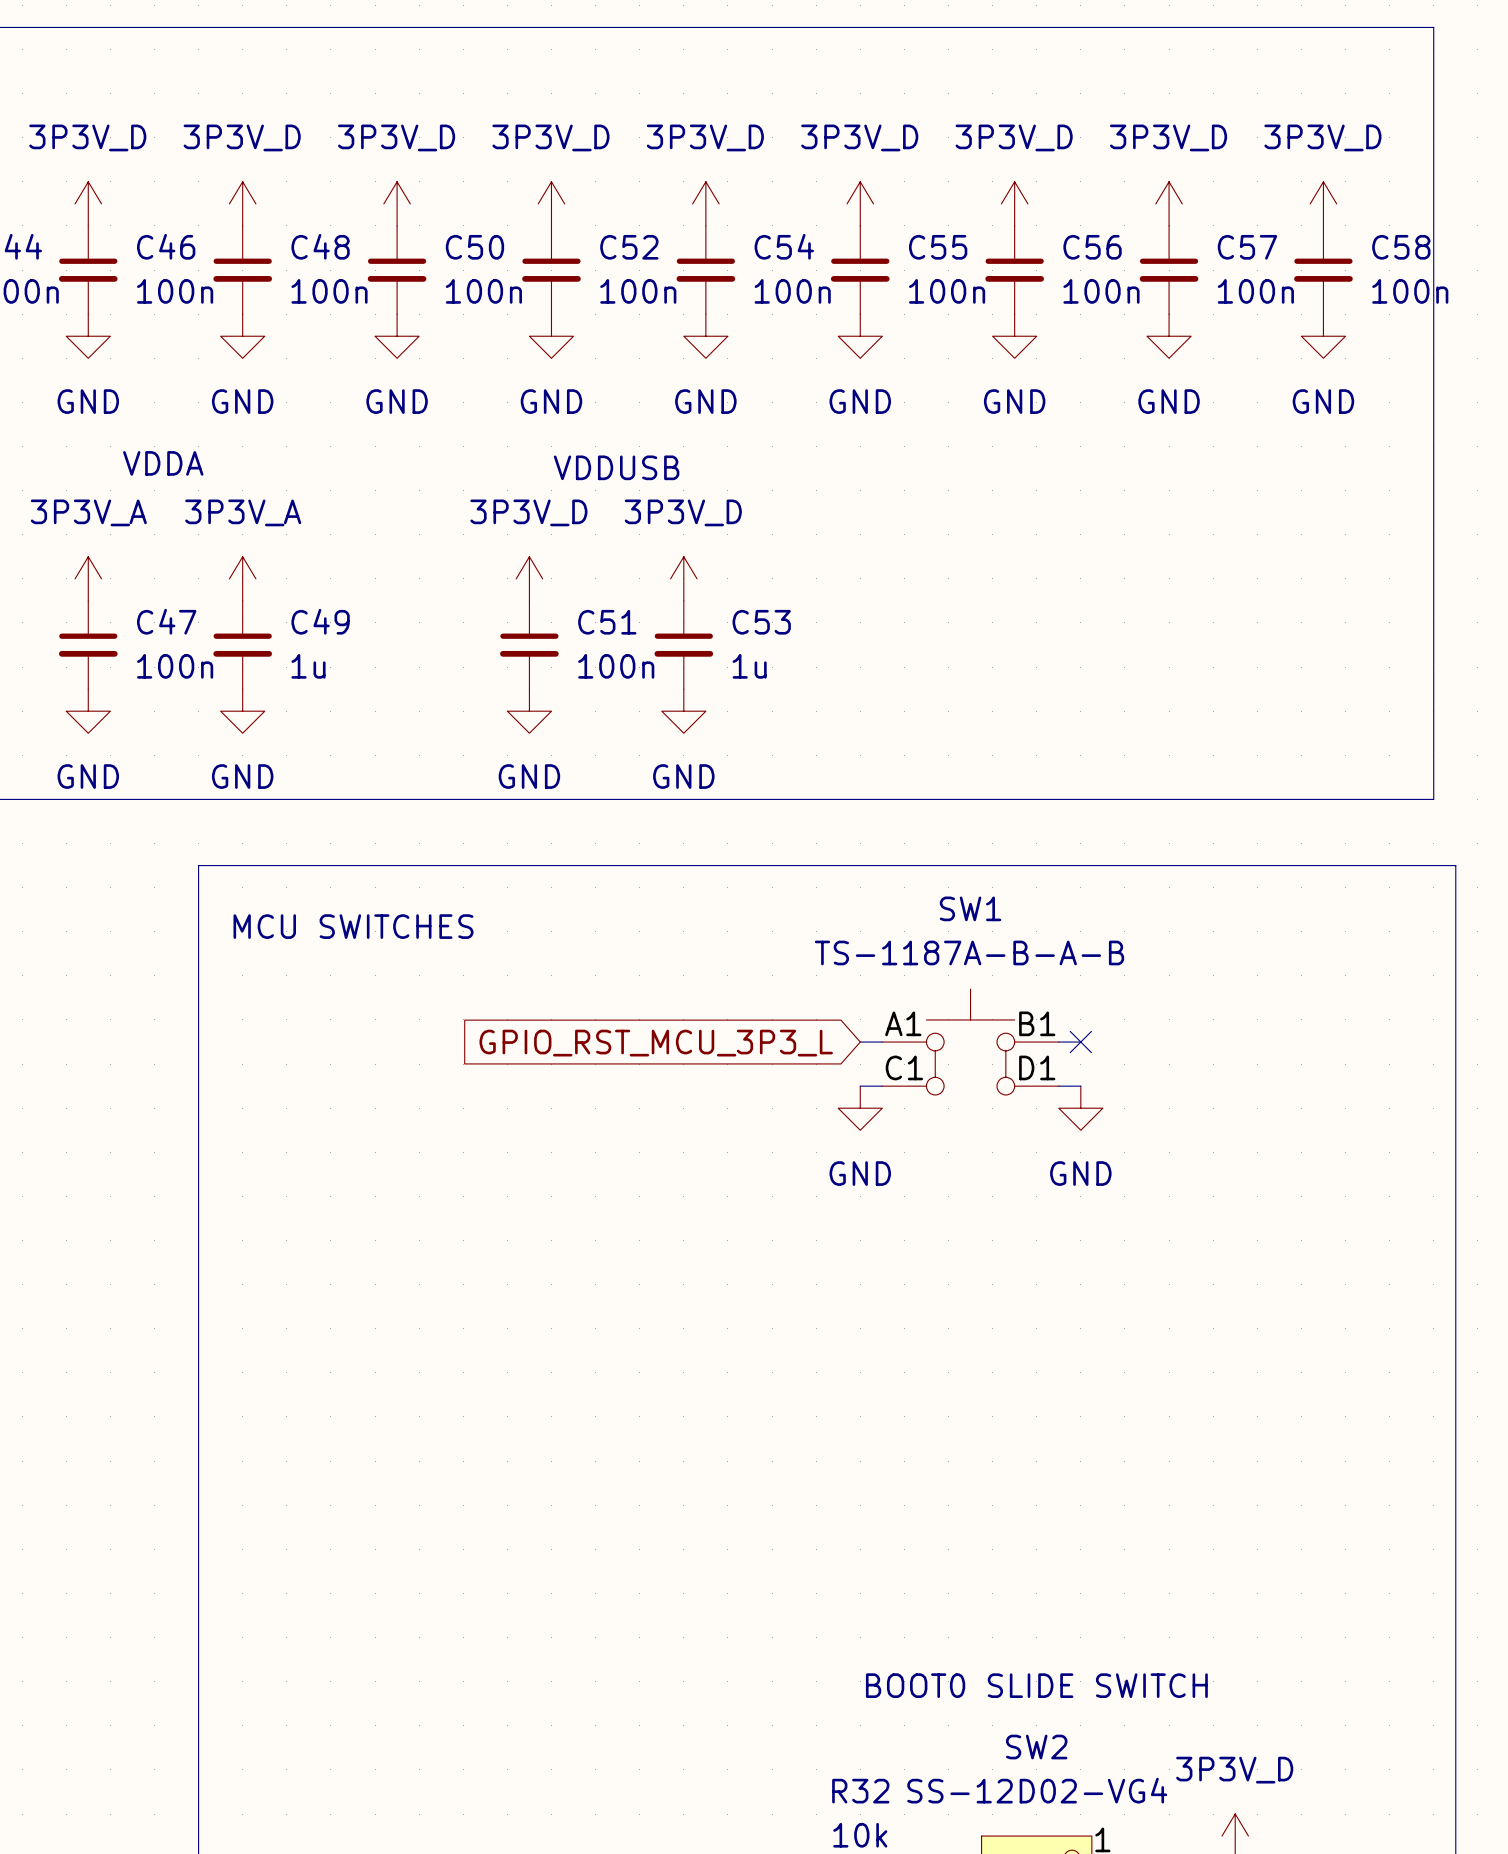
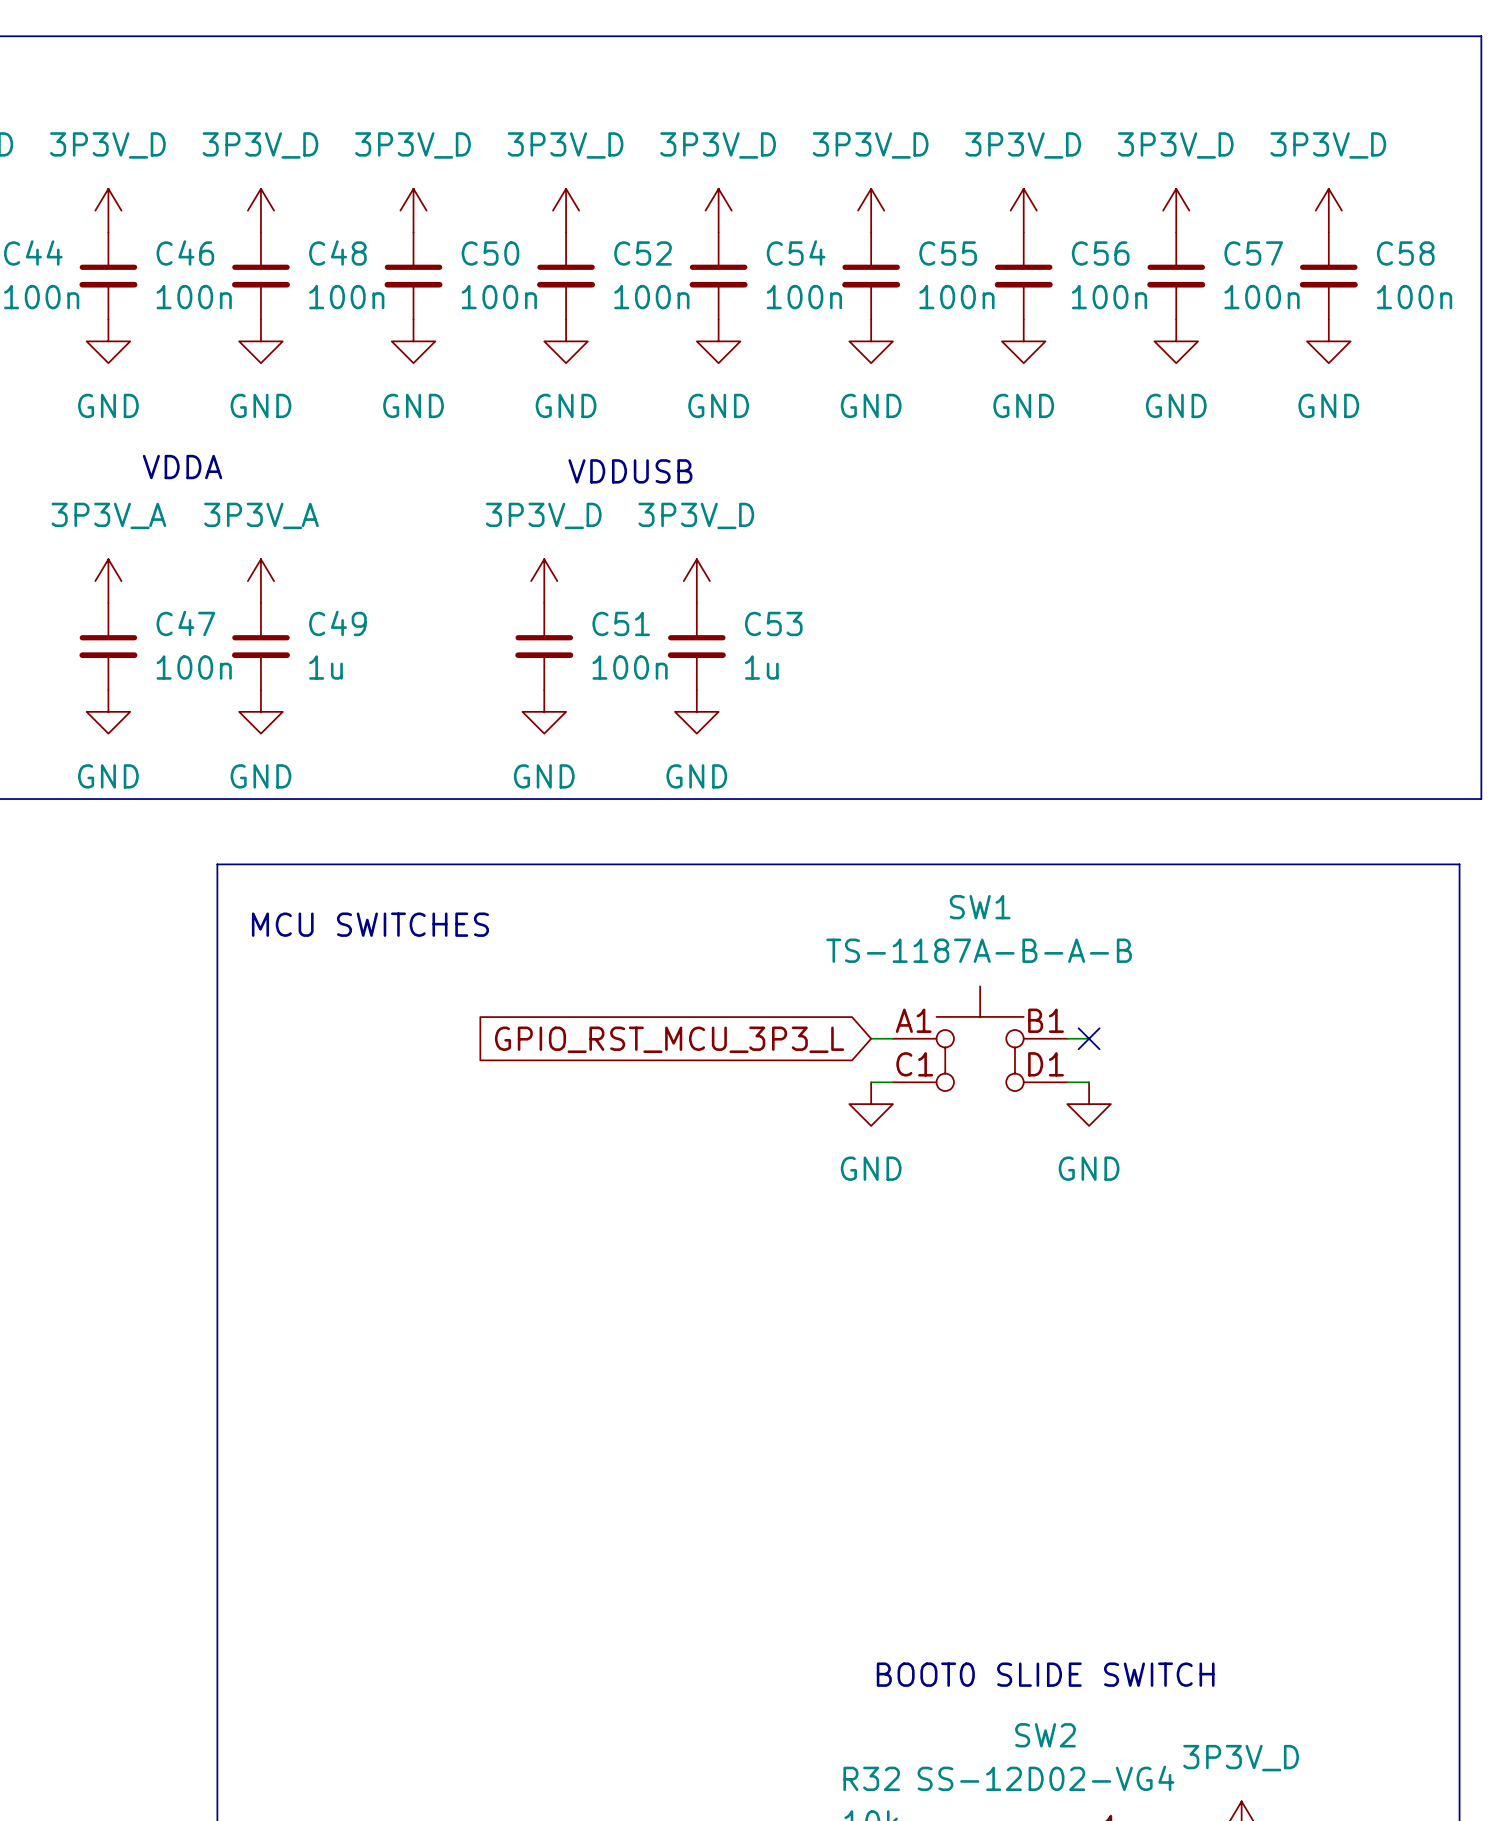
line: (1433, 27) (1433, 799) -> (1437, 36) (1481, 36) (1481, 799) (1437, 799)

